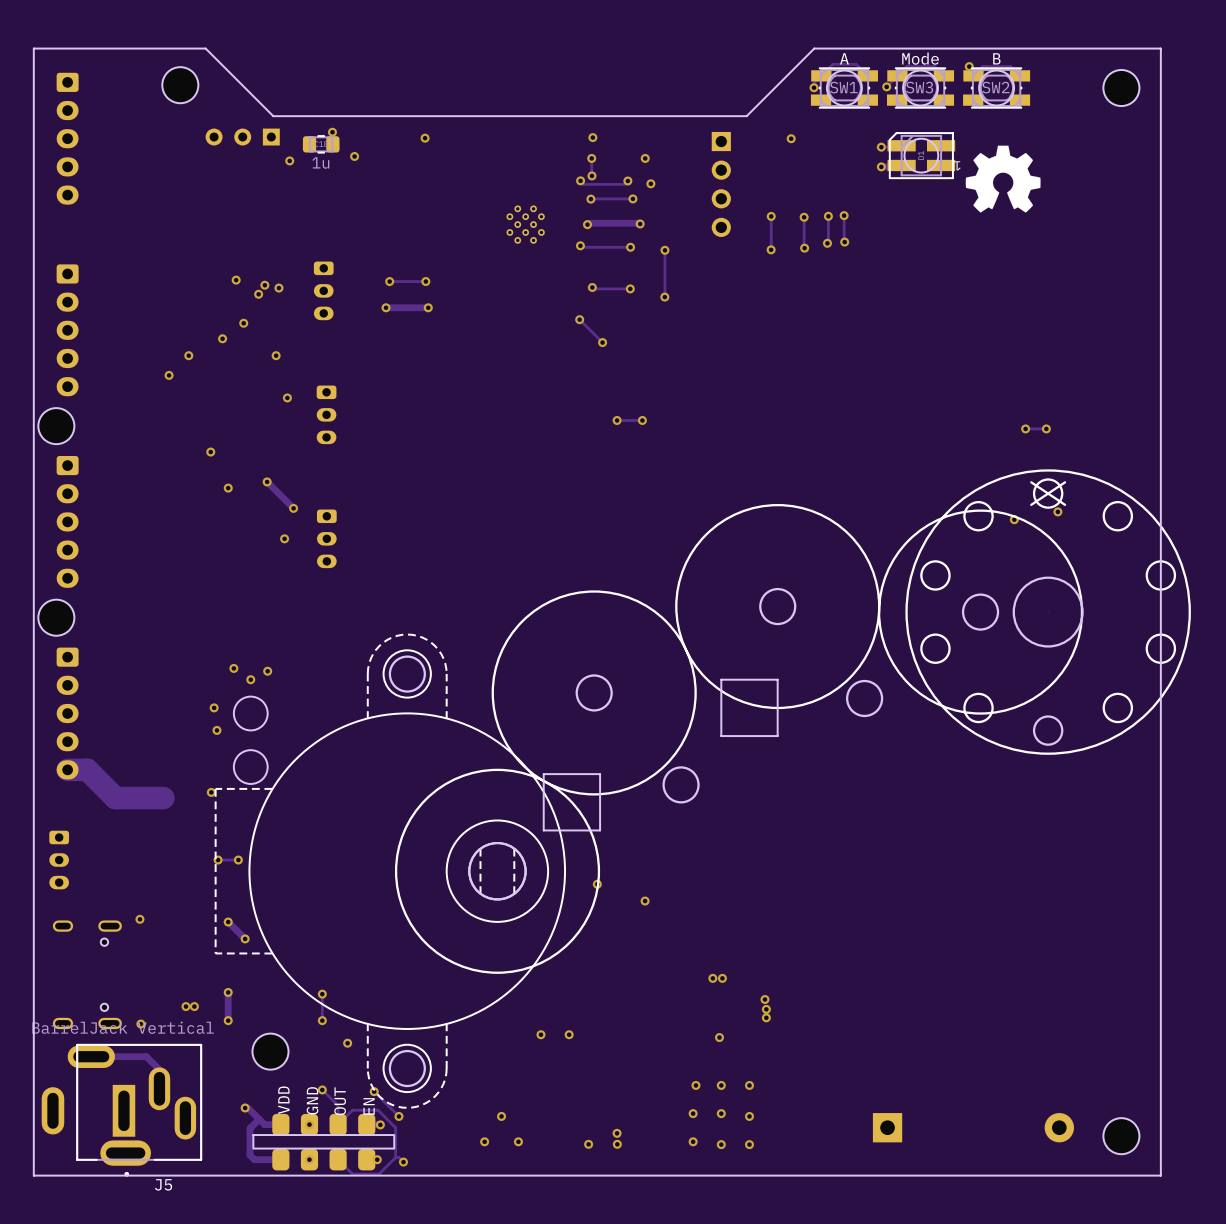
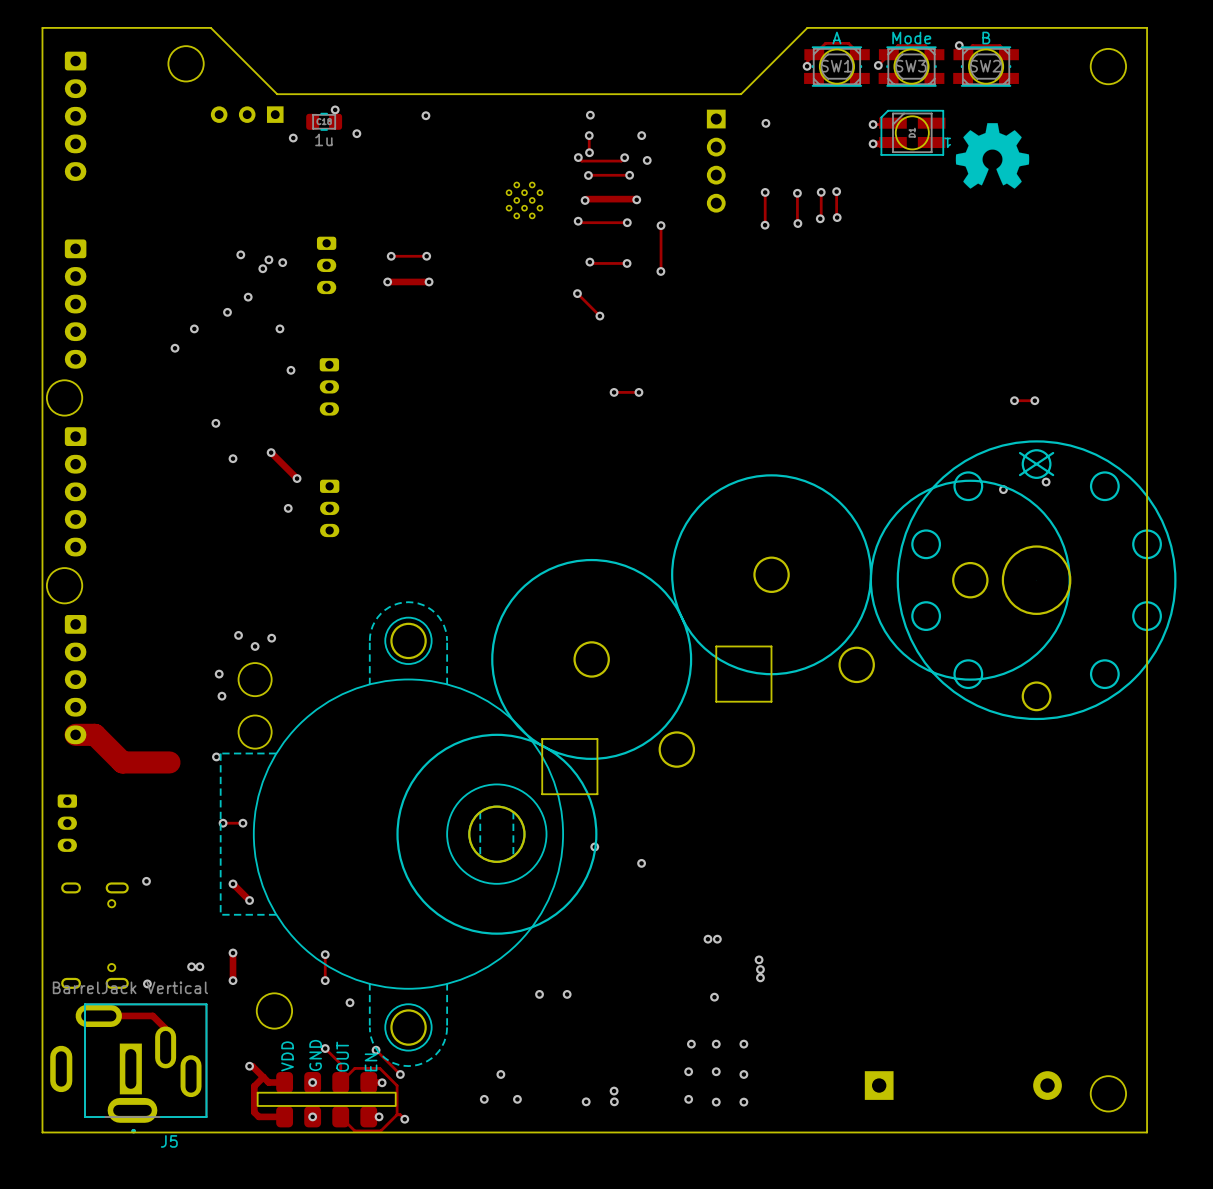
via position: (791, 138) -> (765, 123)

